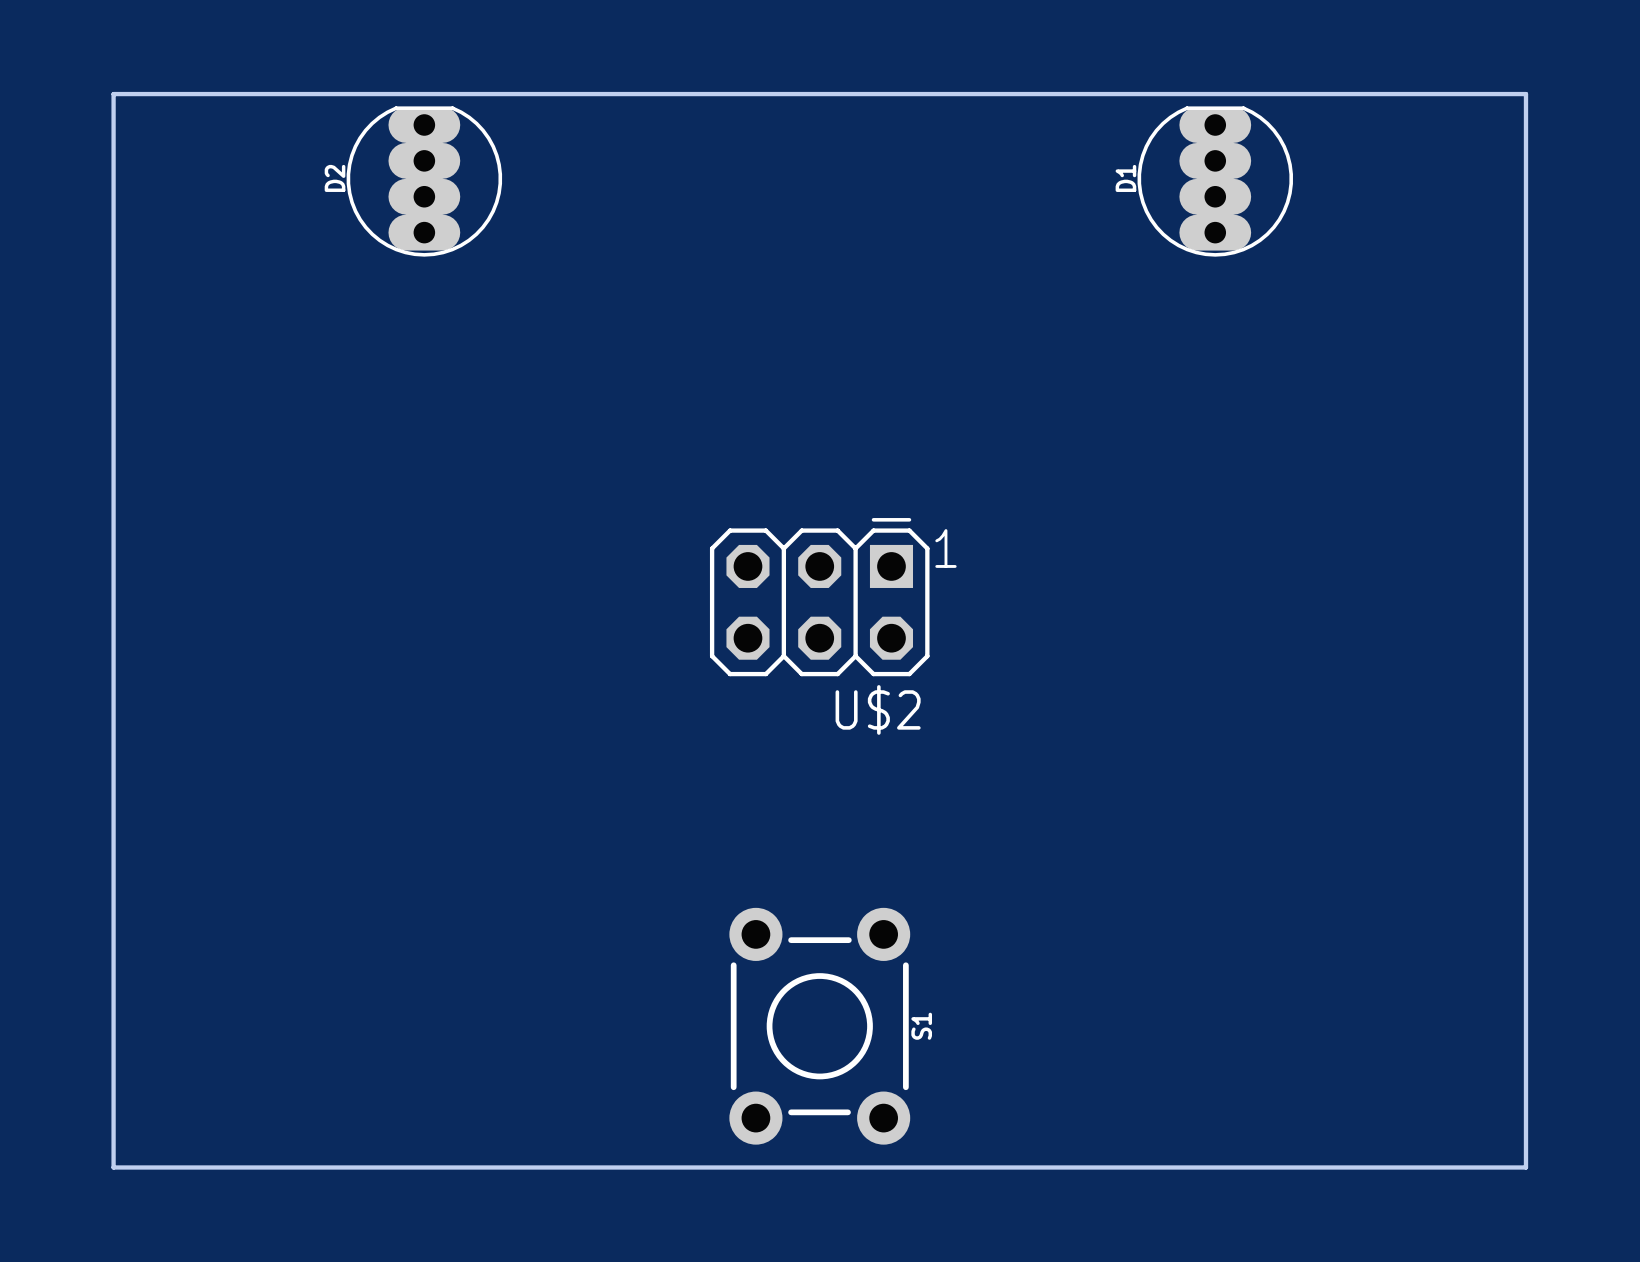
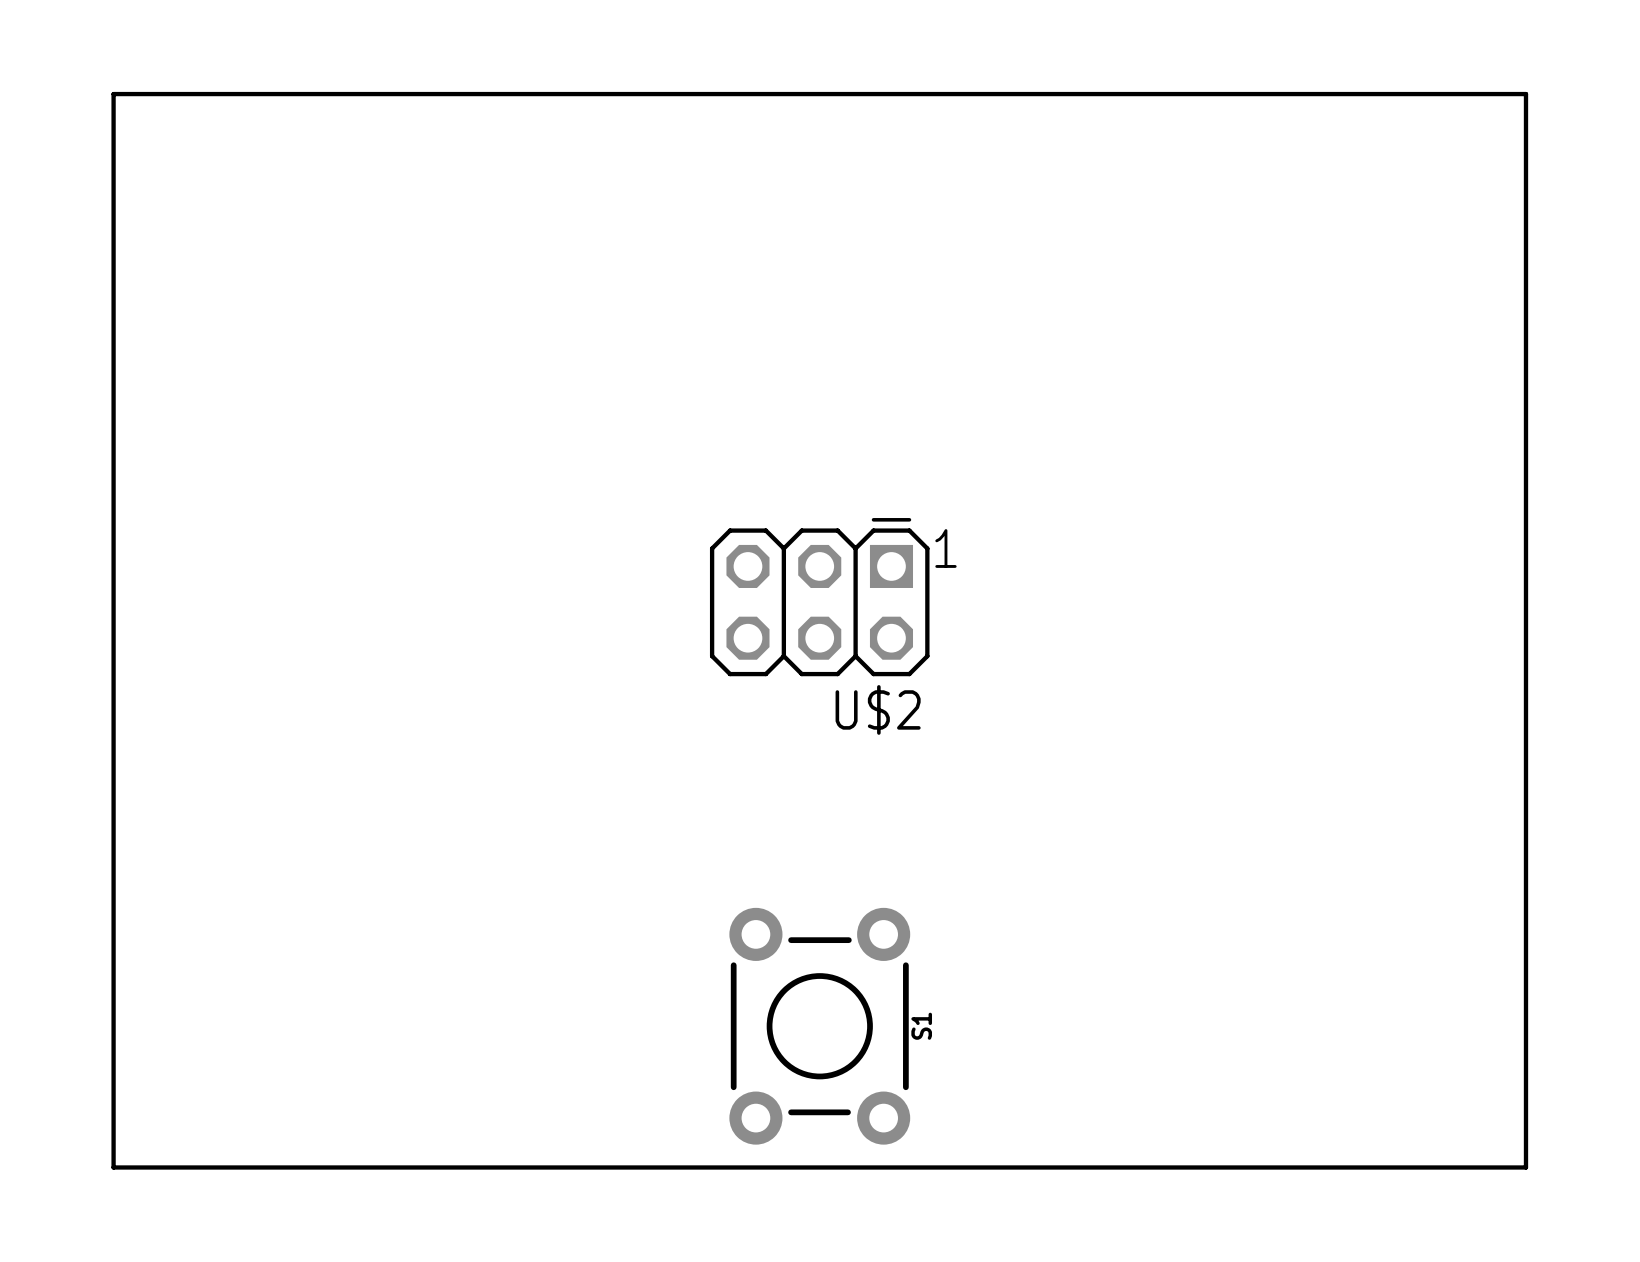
D2: (424, 181) -> none
D1: (1215, 181) -> none

